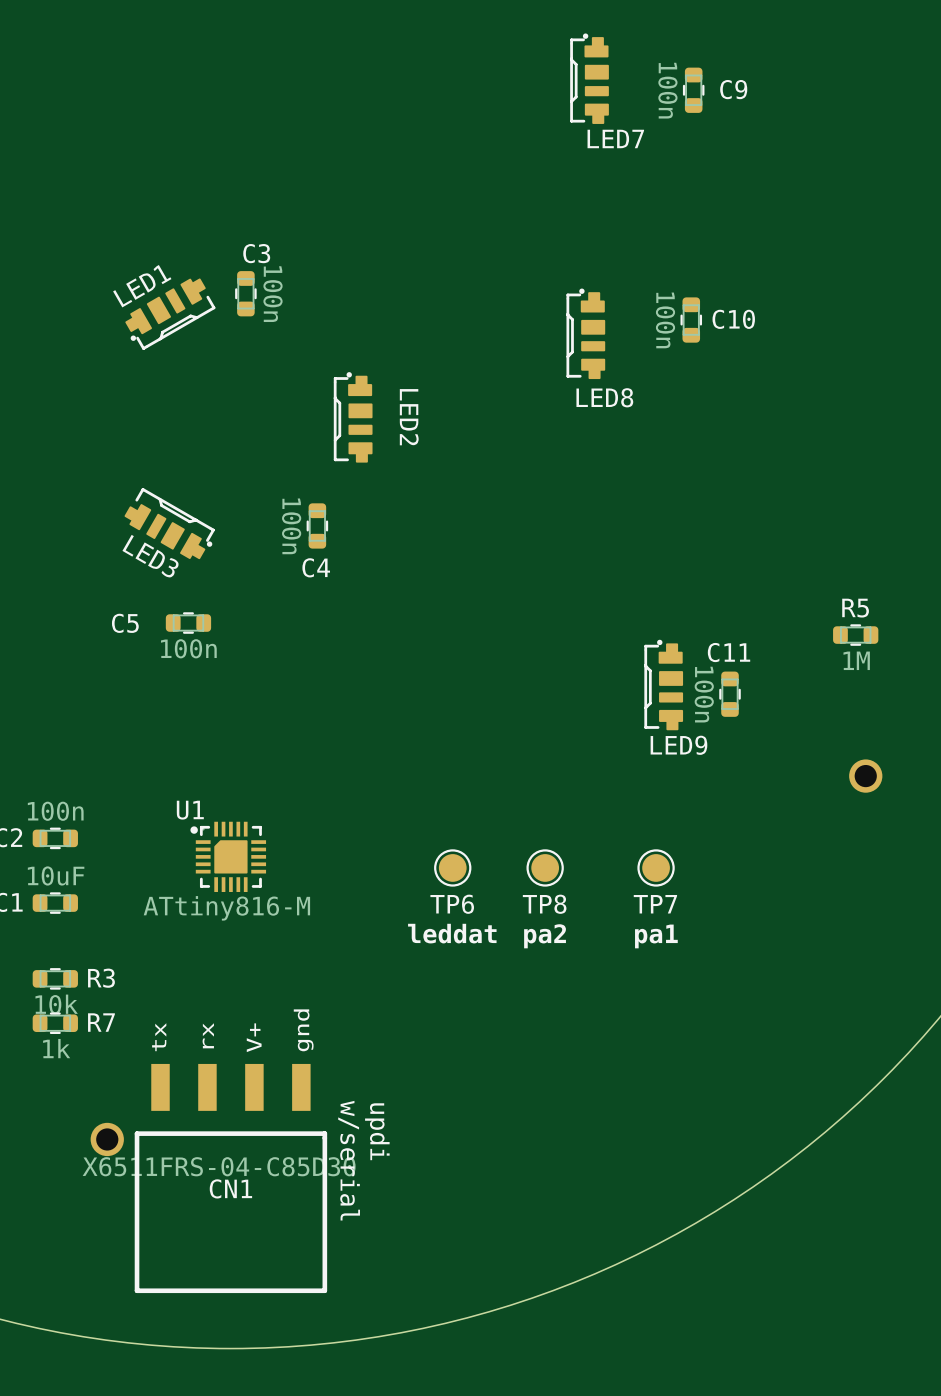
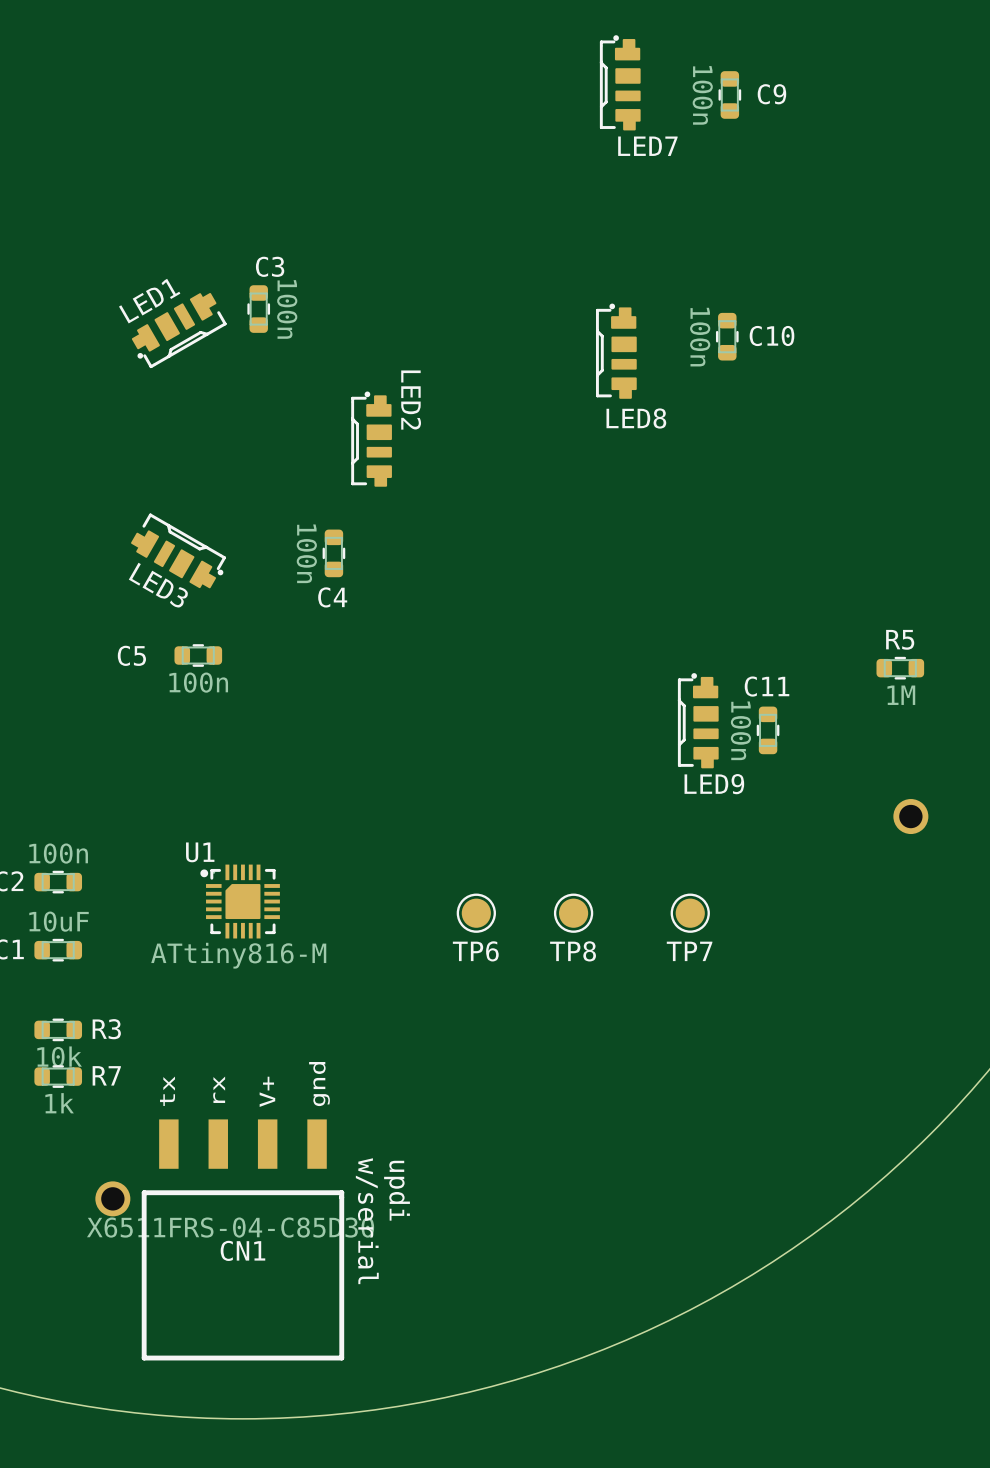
LED2 name position: LED2 (409, 417) -> LED2 (411, 400)
text: leddat (452, 933) -> none
text: pa2 (545, 936) -> none
text: pa1 (656, 936) -> none

